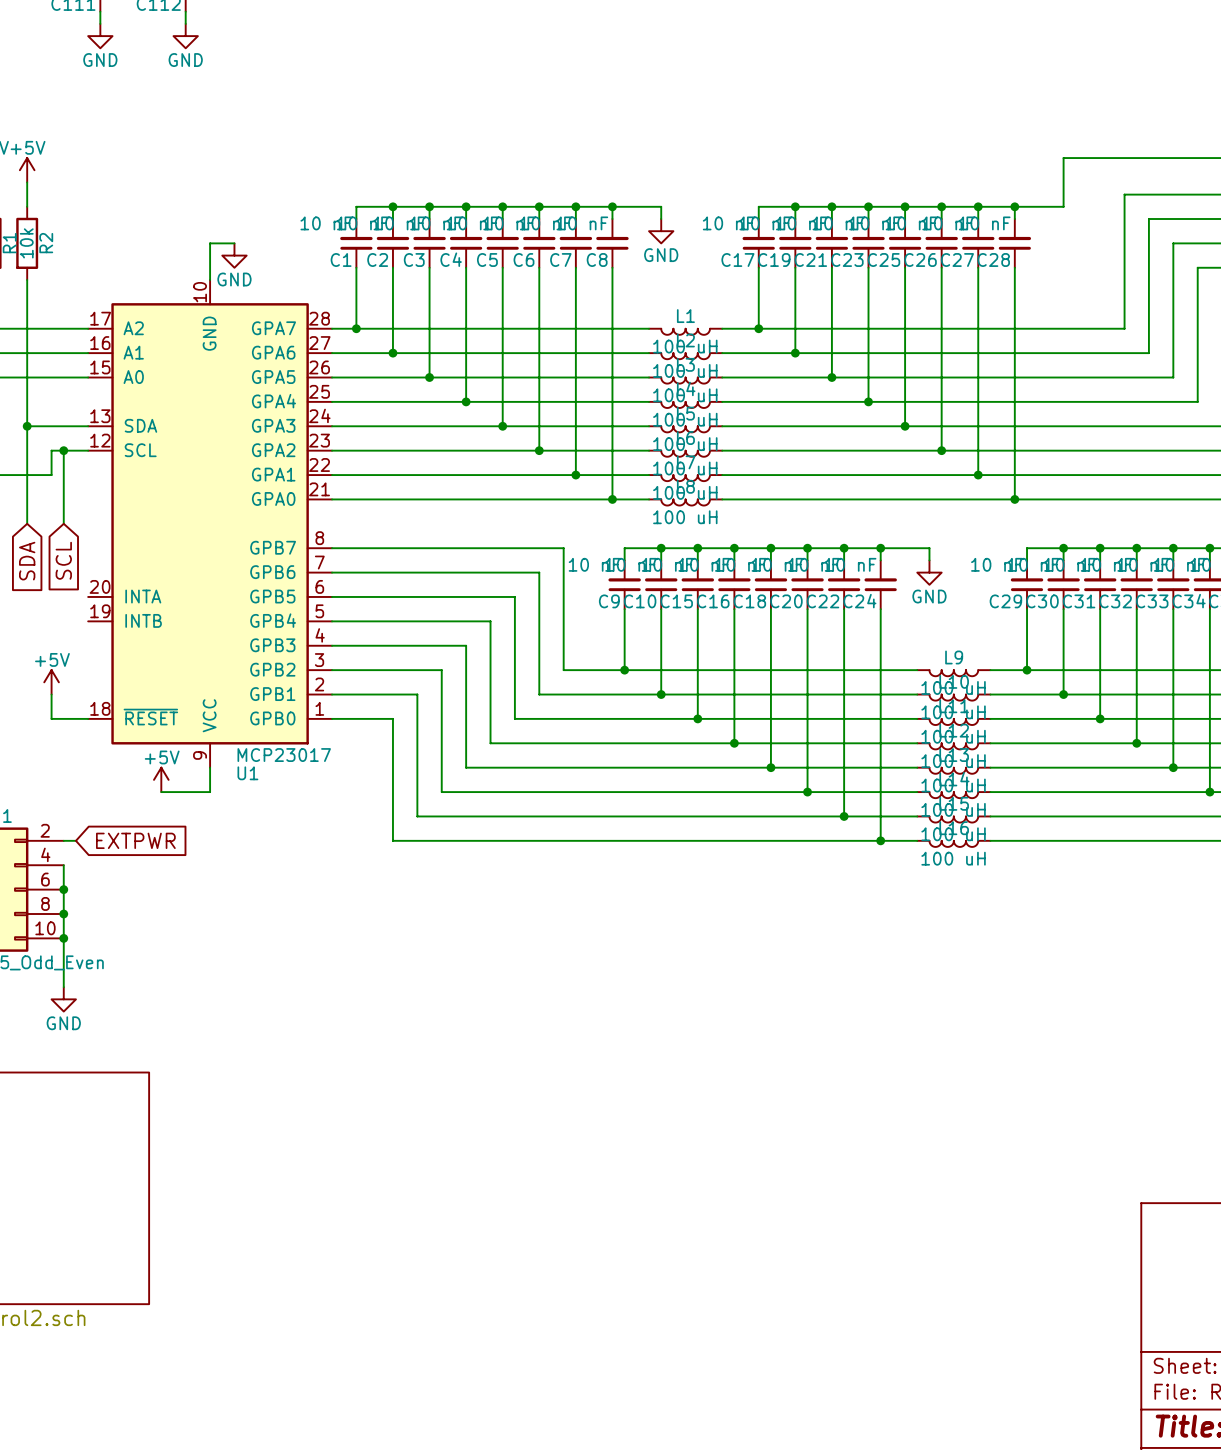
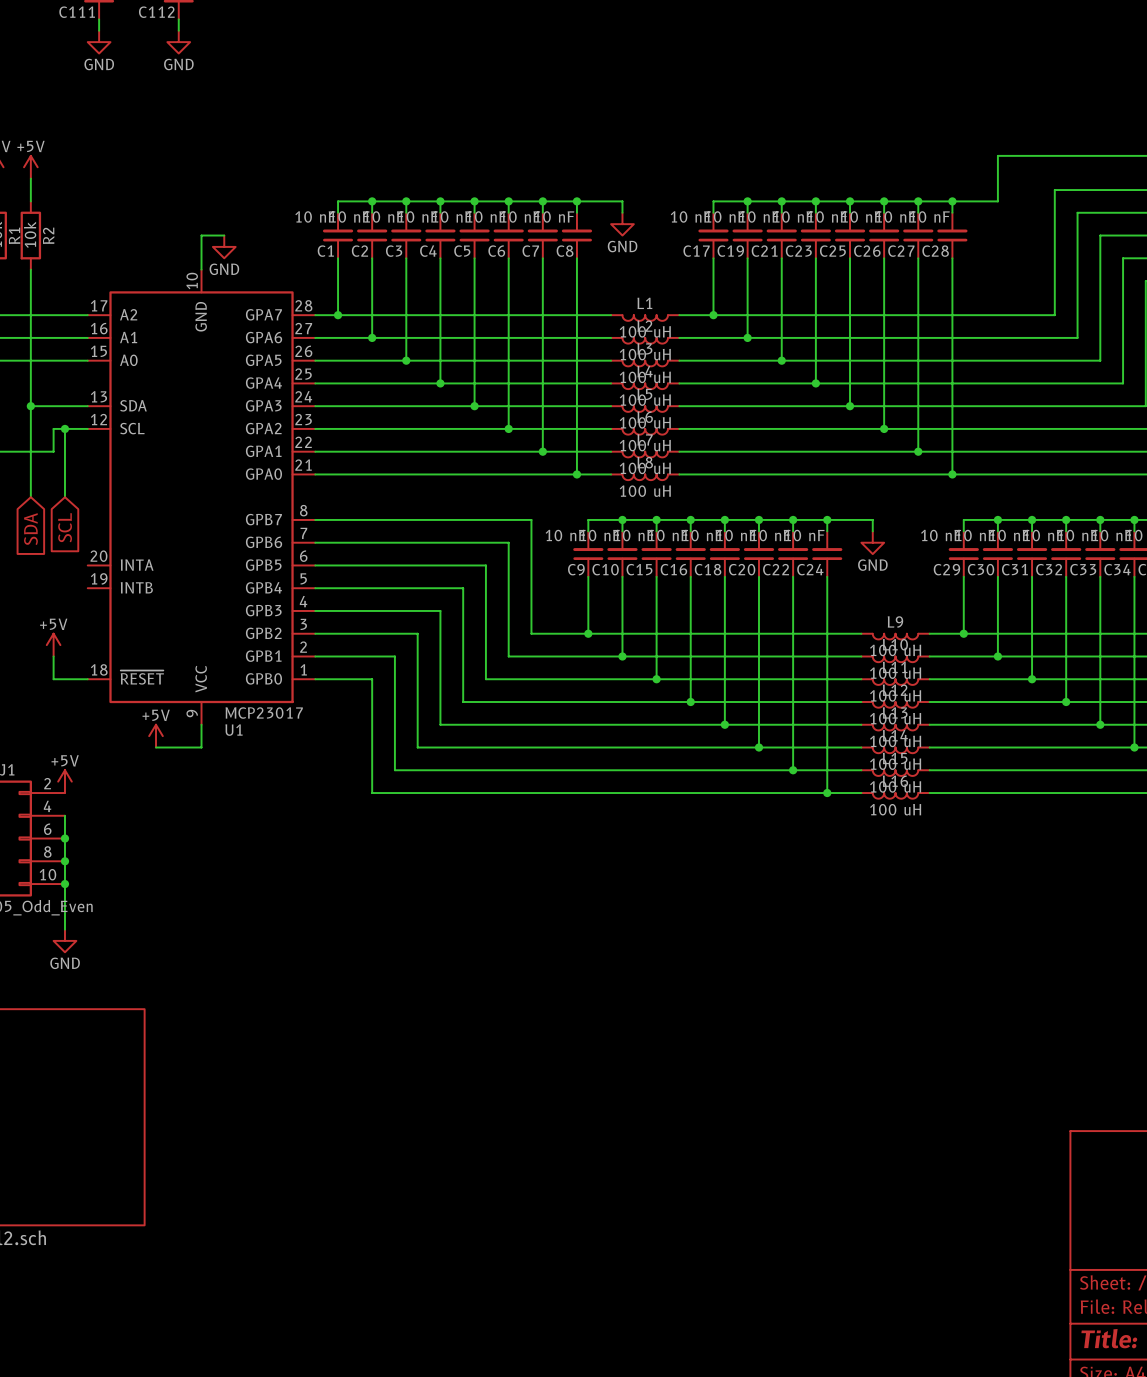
power symbol: none -> +5V (64, 781)
wire: (63, 840) (75, 840) -> none
global label: EXTPWR (135, 840) -> none

